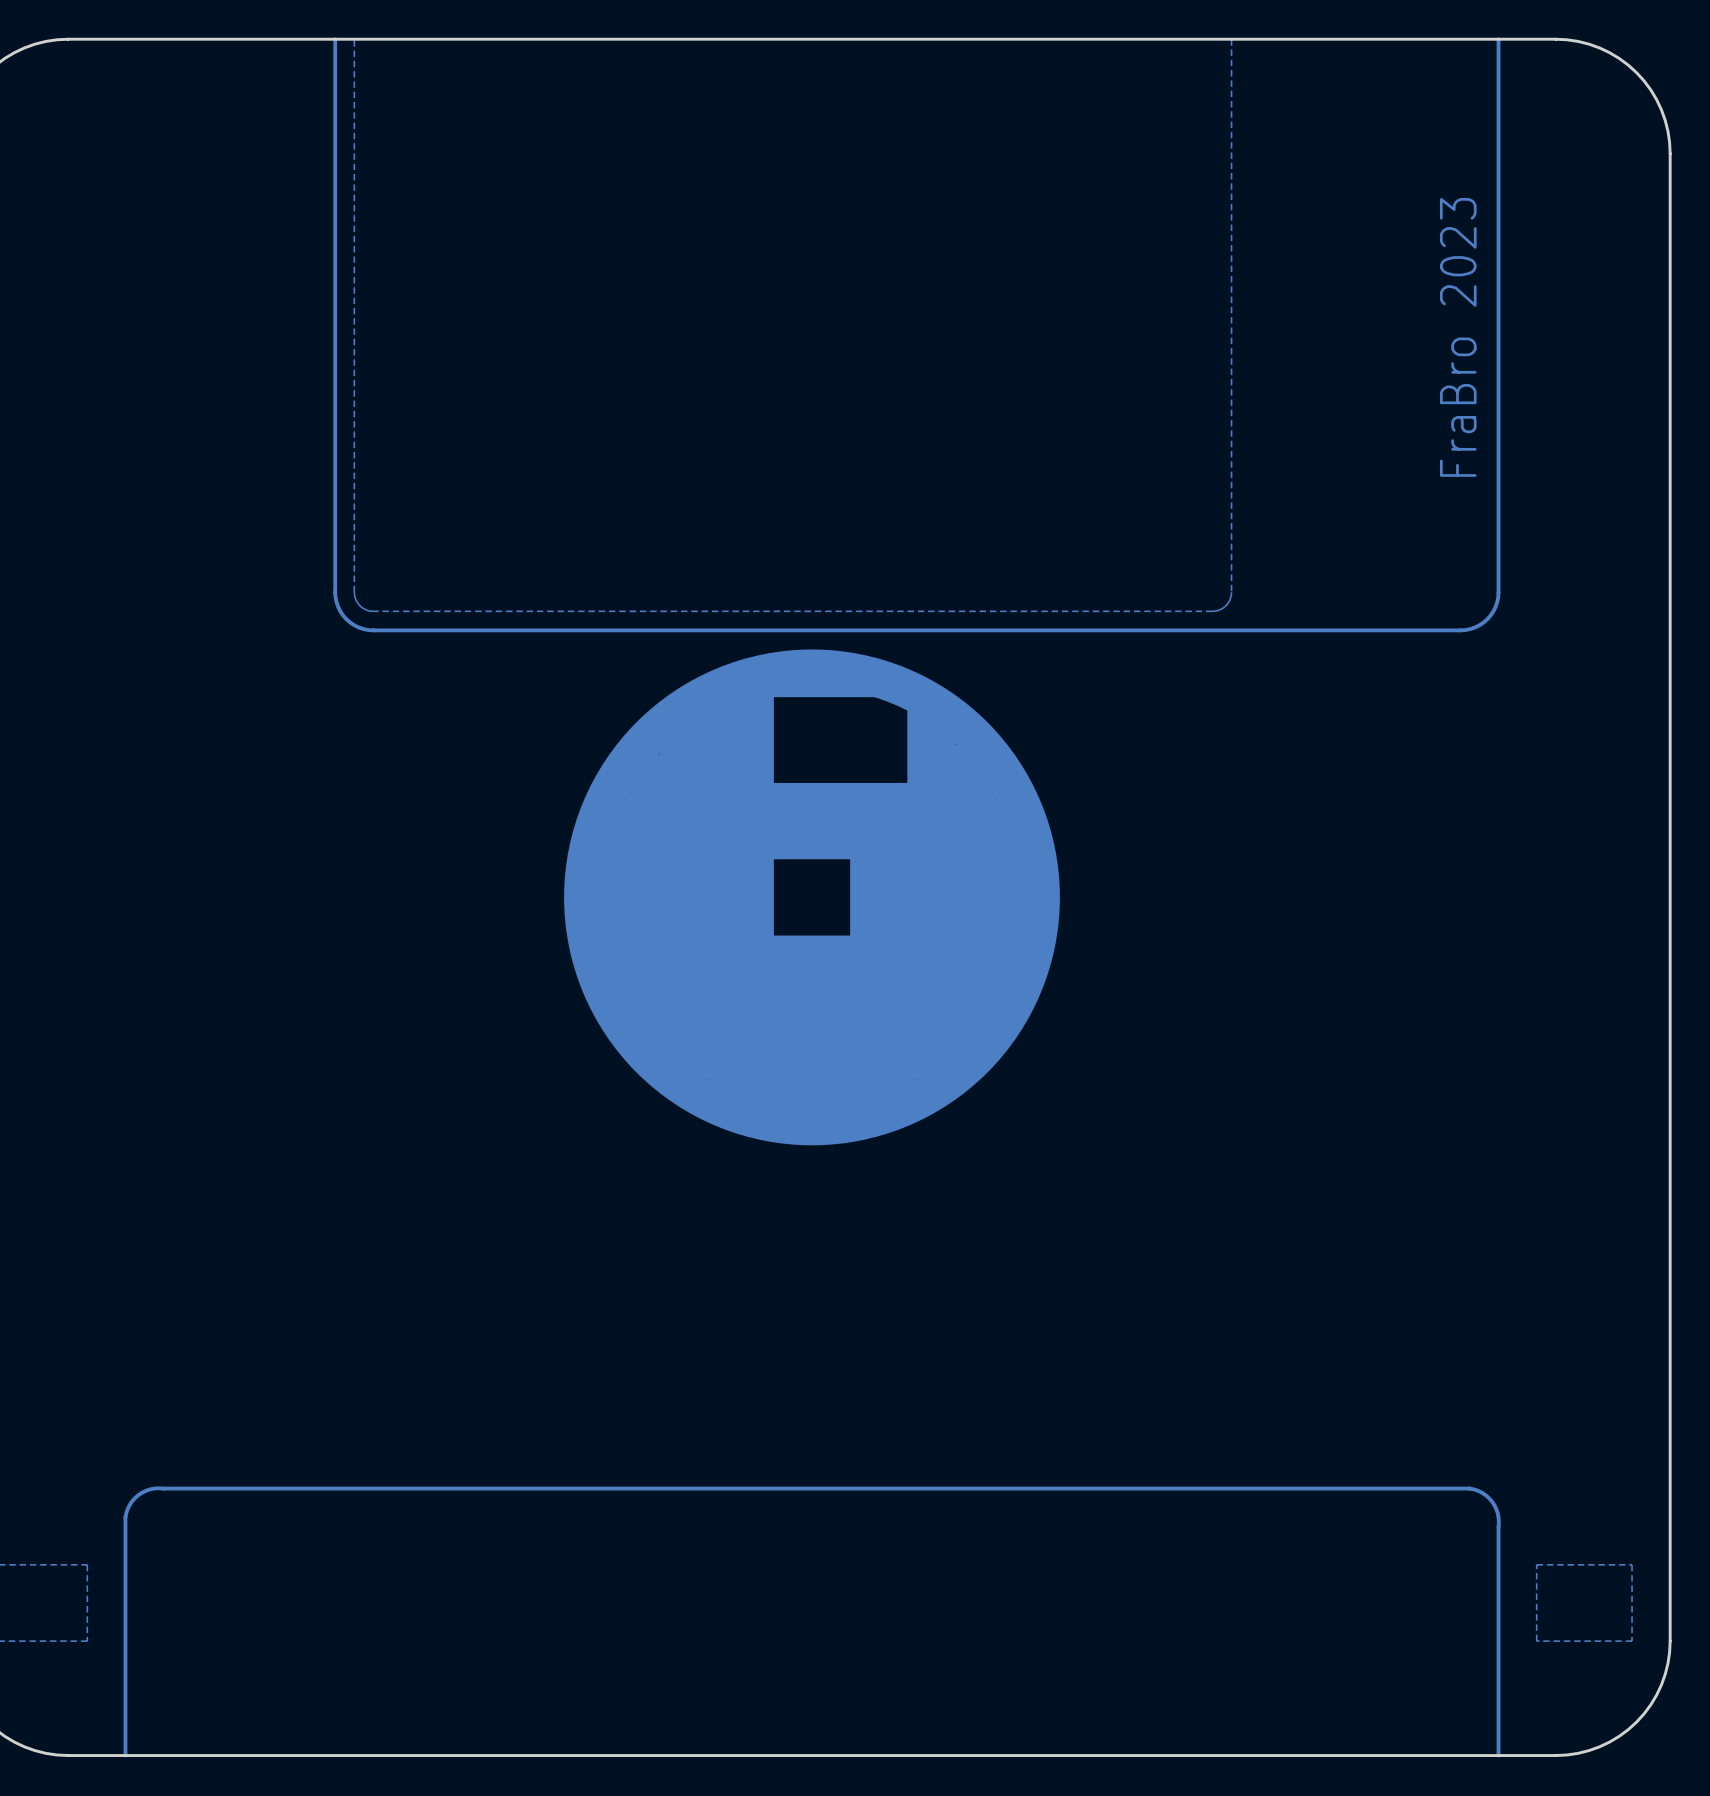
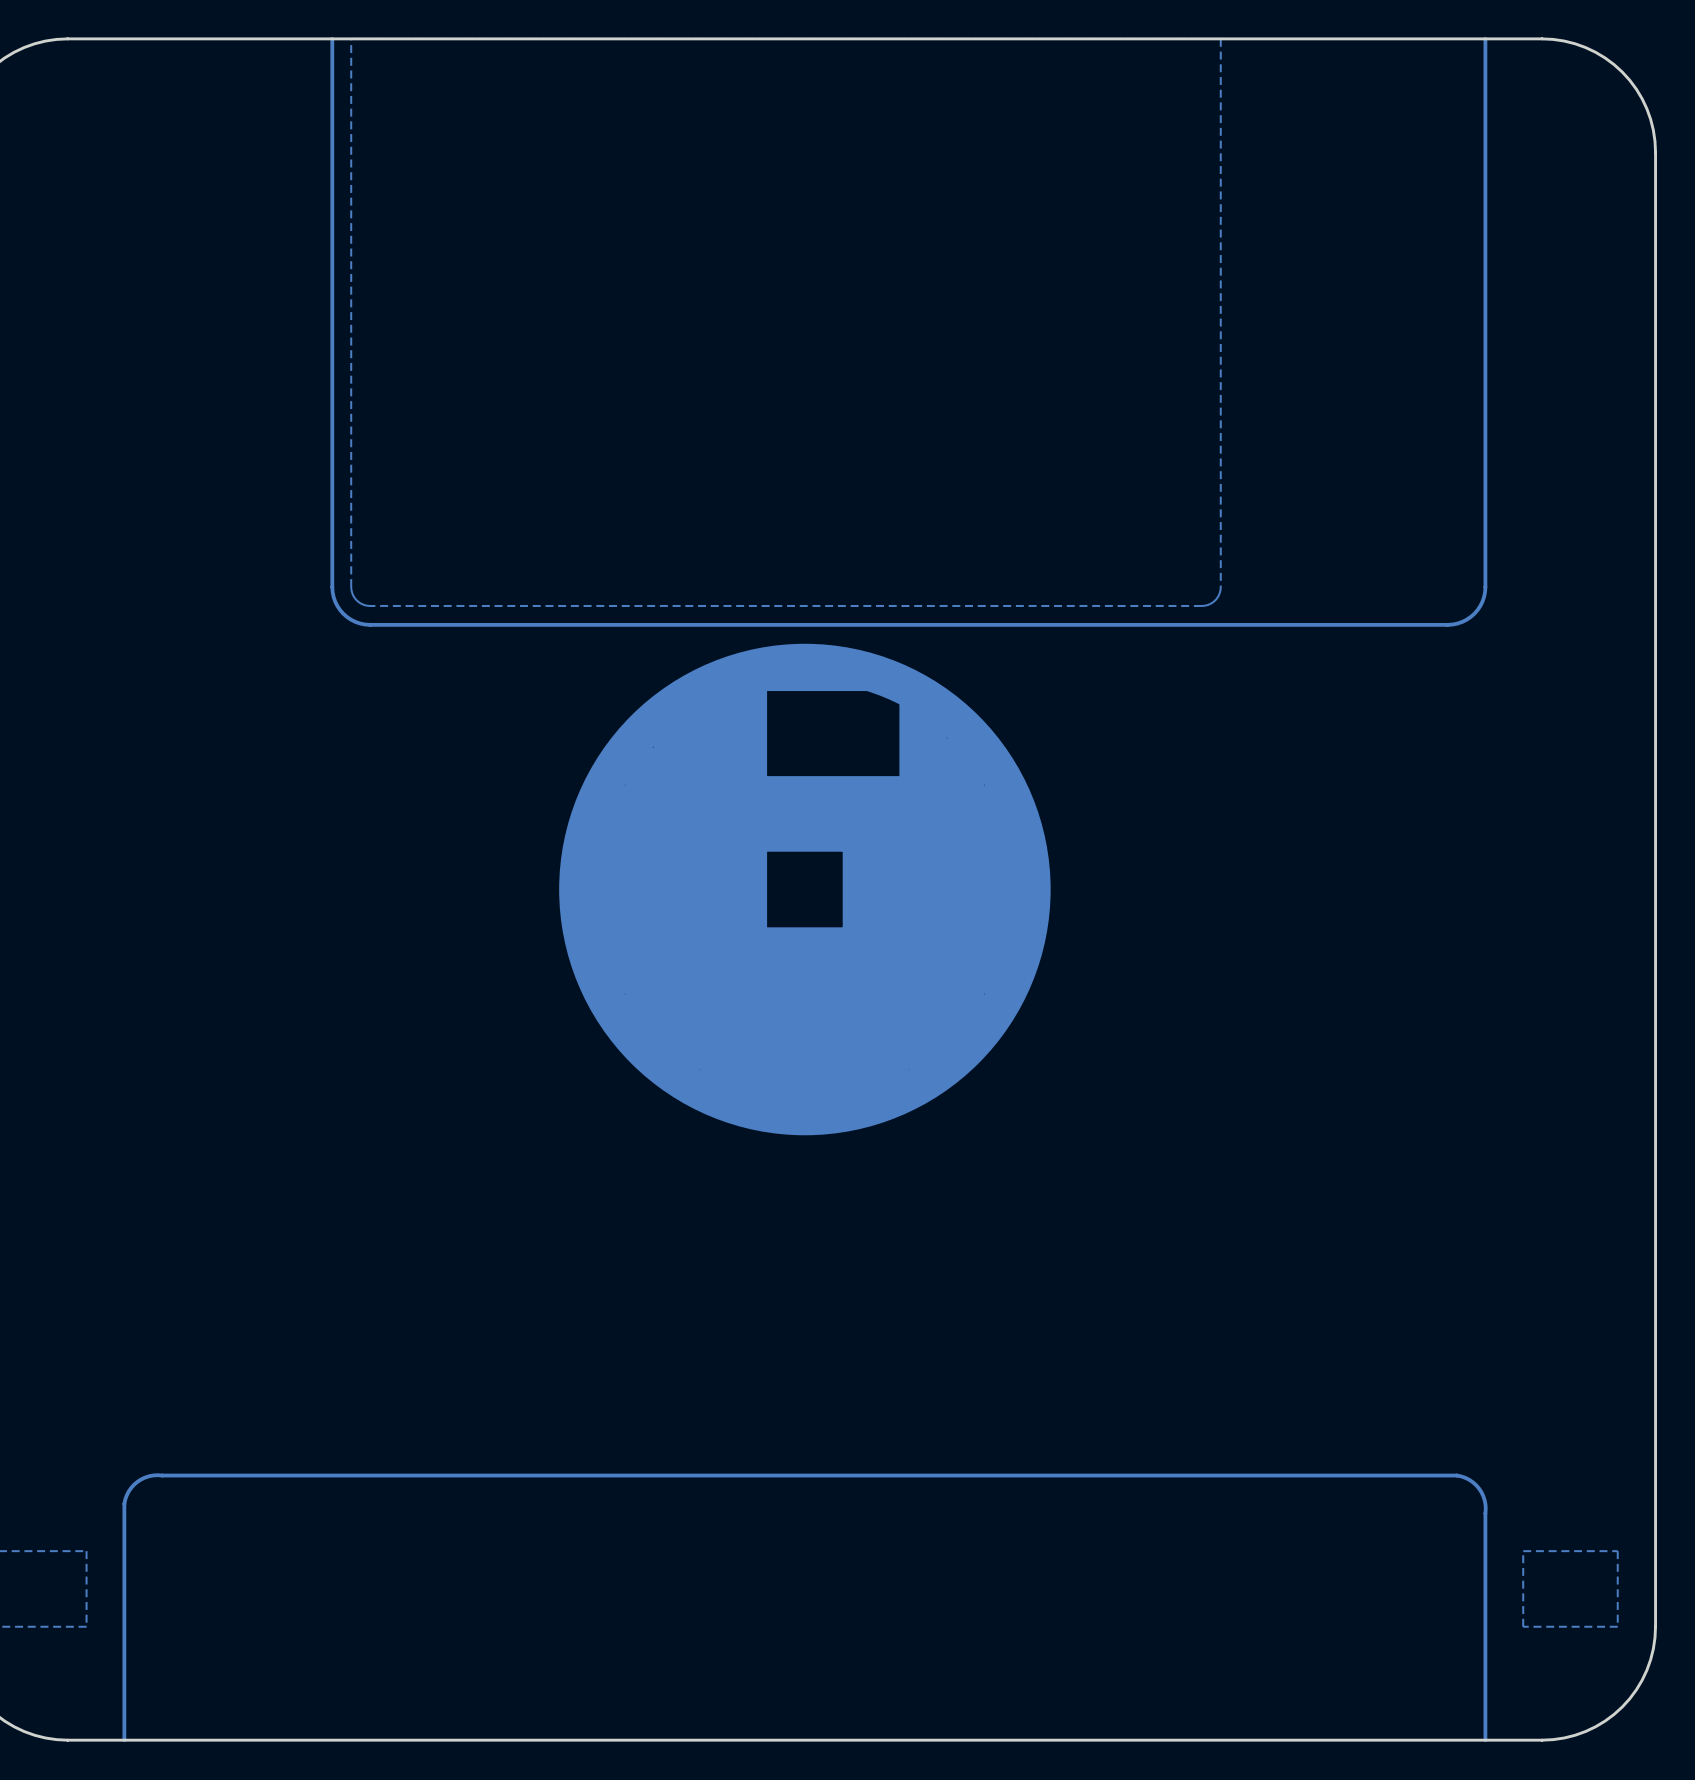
text: FraBro 2023 (1458, 337) -> none

